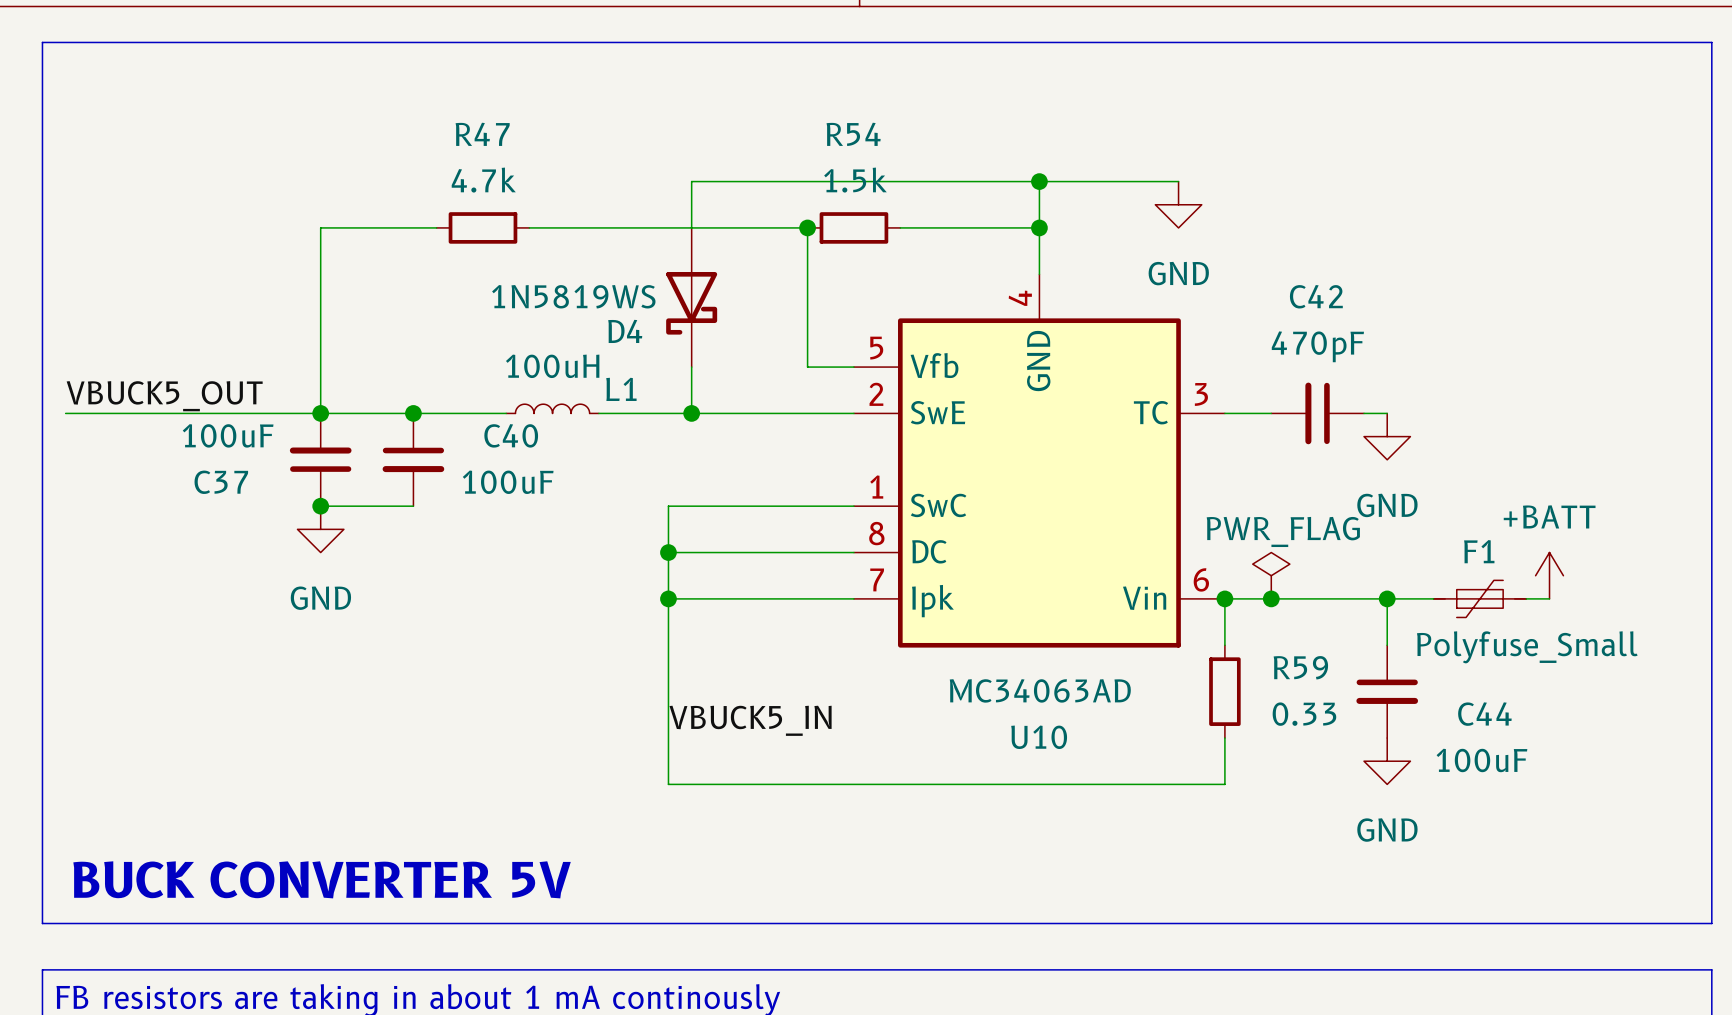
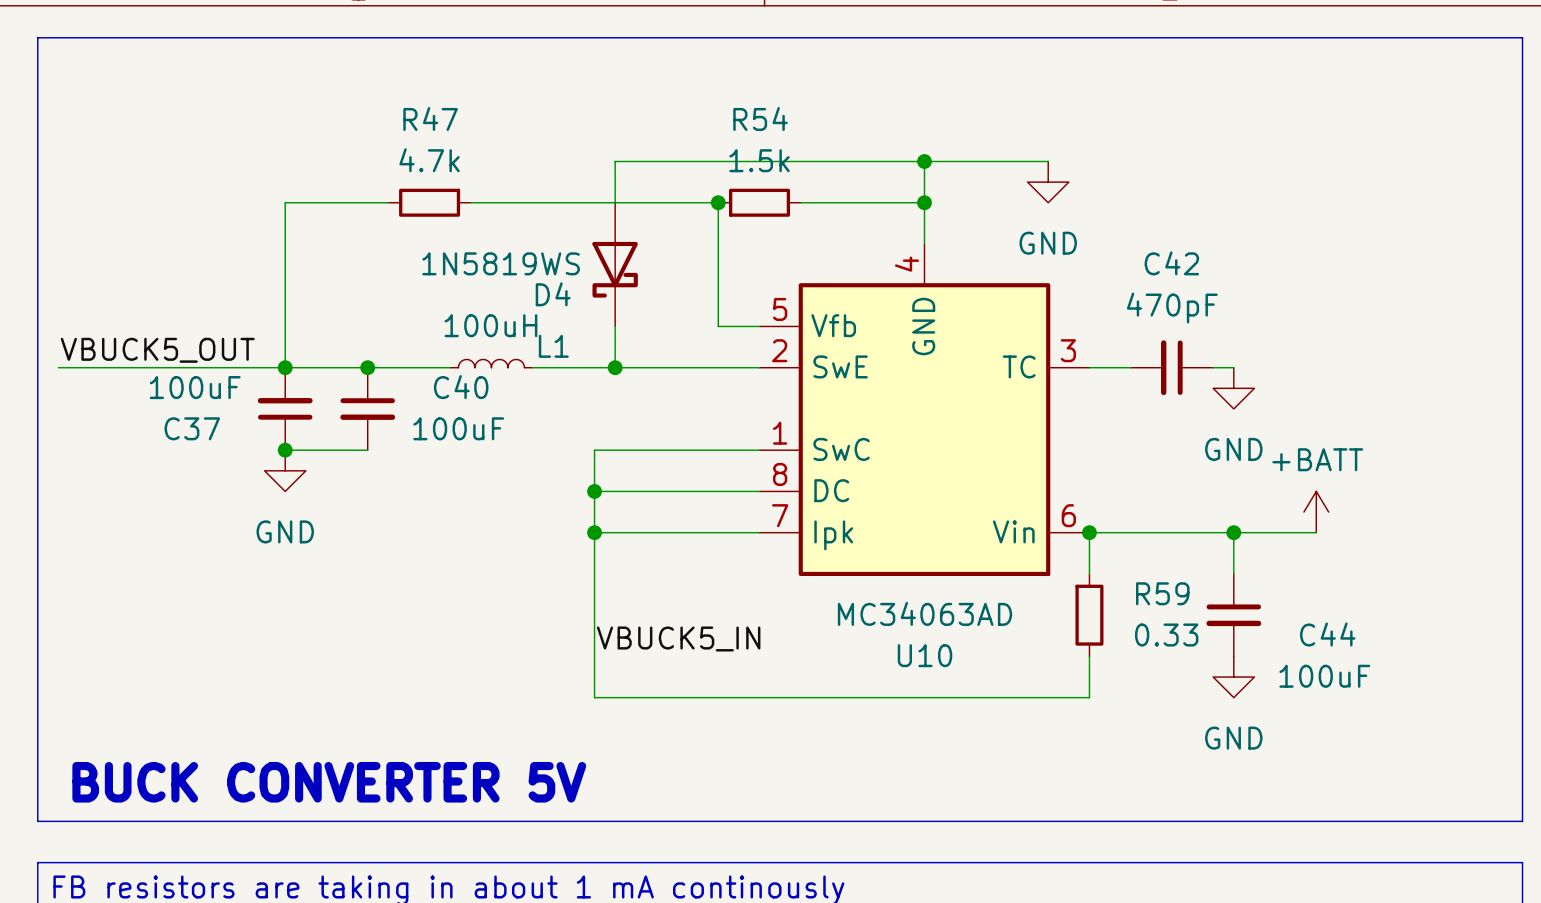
power symbol: PWR_FLAG (1271, 575) -> none
power symbol position: +BATT (1549, 575) -> +BATT (1316, 512)
junction: (1271, 598) -> none
F1: Polyfuse_Small (1479, 598) -> none
wire: (1526, 598) (1549, 598) -> none

